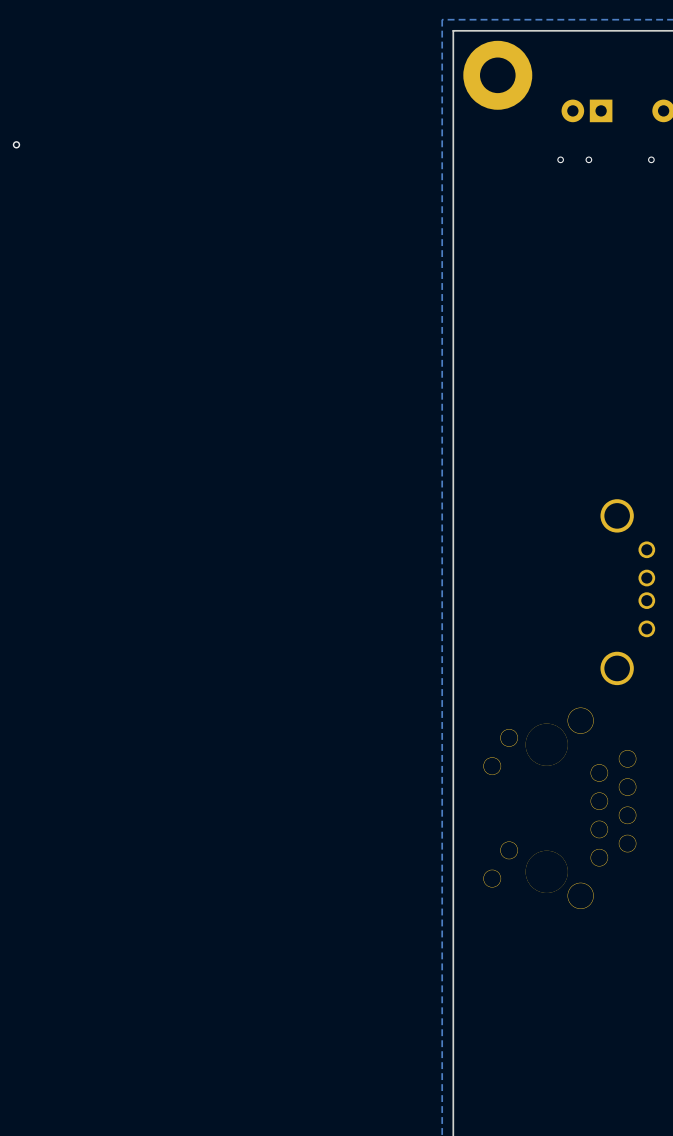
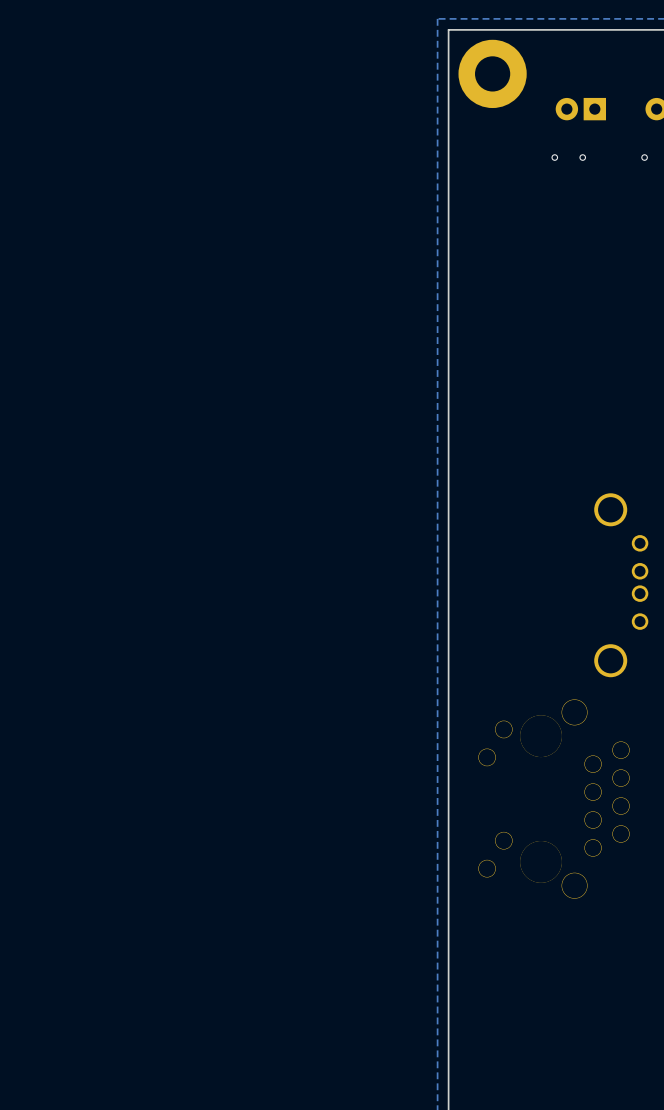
via: (16, 144) -> none

